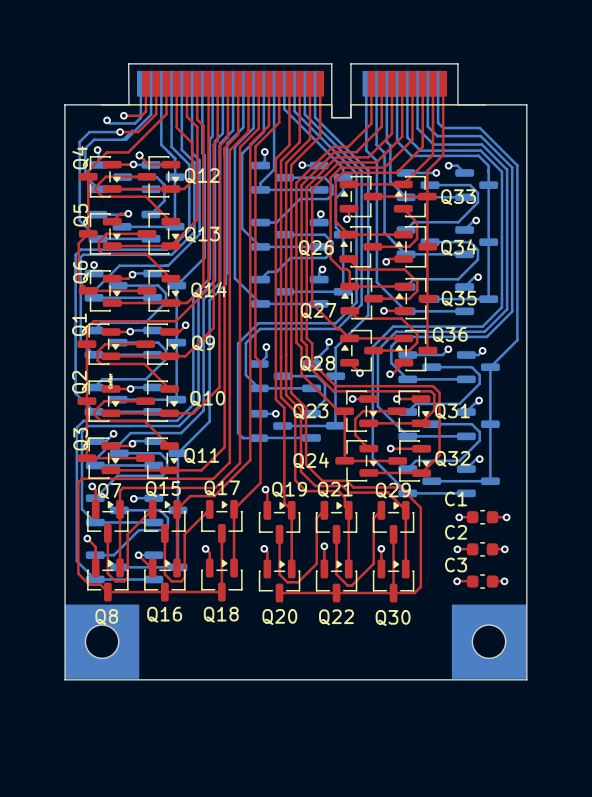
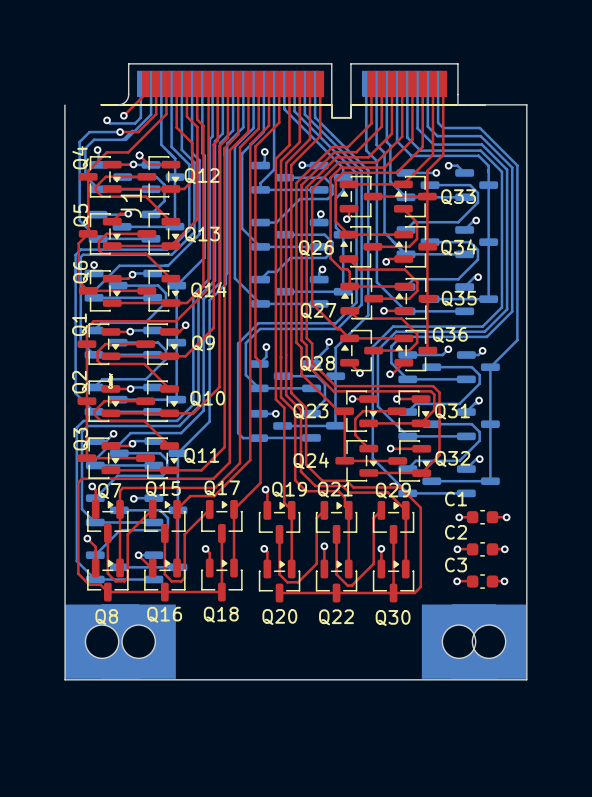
board edge: (128, 63) (128, 104) (64, 105) -> (128, 63) (128, 97) (124, 102) (118, 104)
top track: (145, 93) (145, 111) (141, 115) (123, 115) -> (145, 93) (123, 115)
J1: none -> (298, 374)
bottom track: (138, 530) (113, 555) (95, 555) -> (138, 530) (120, 530) (95, 555)

